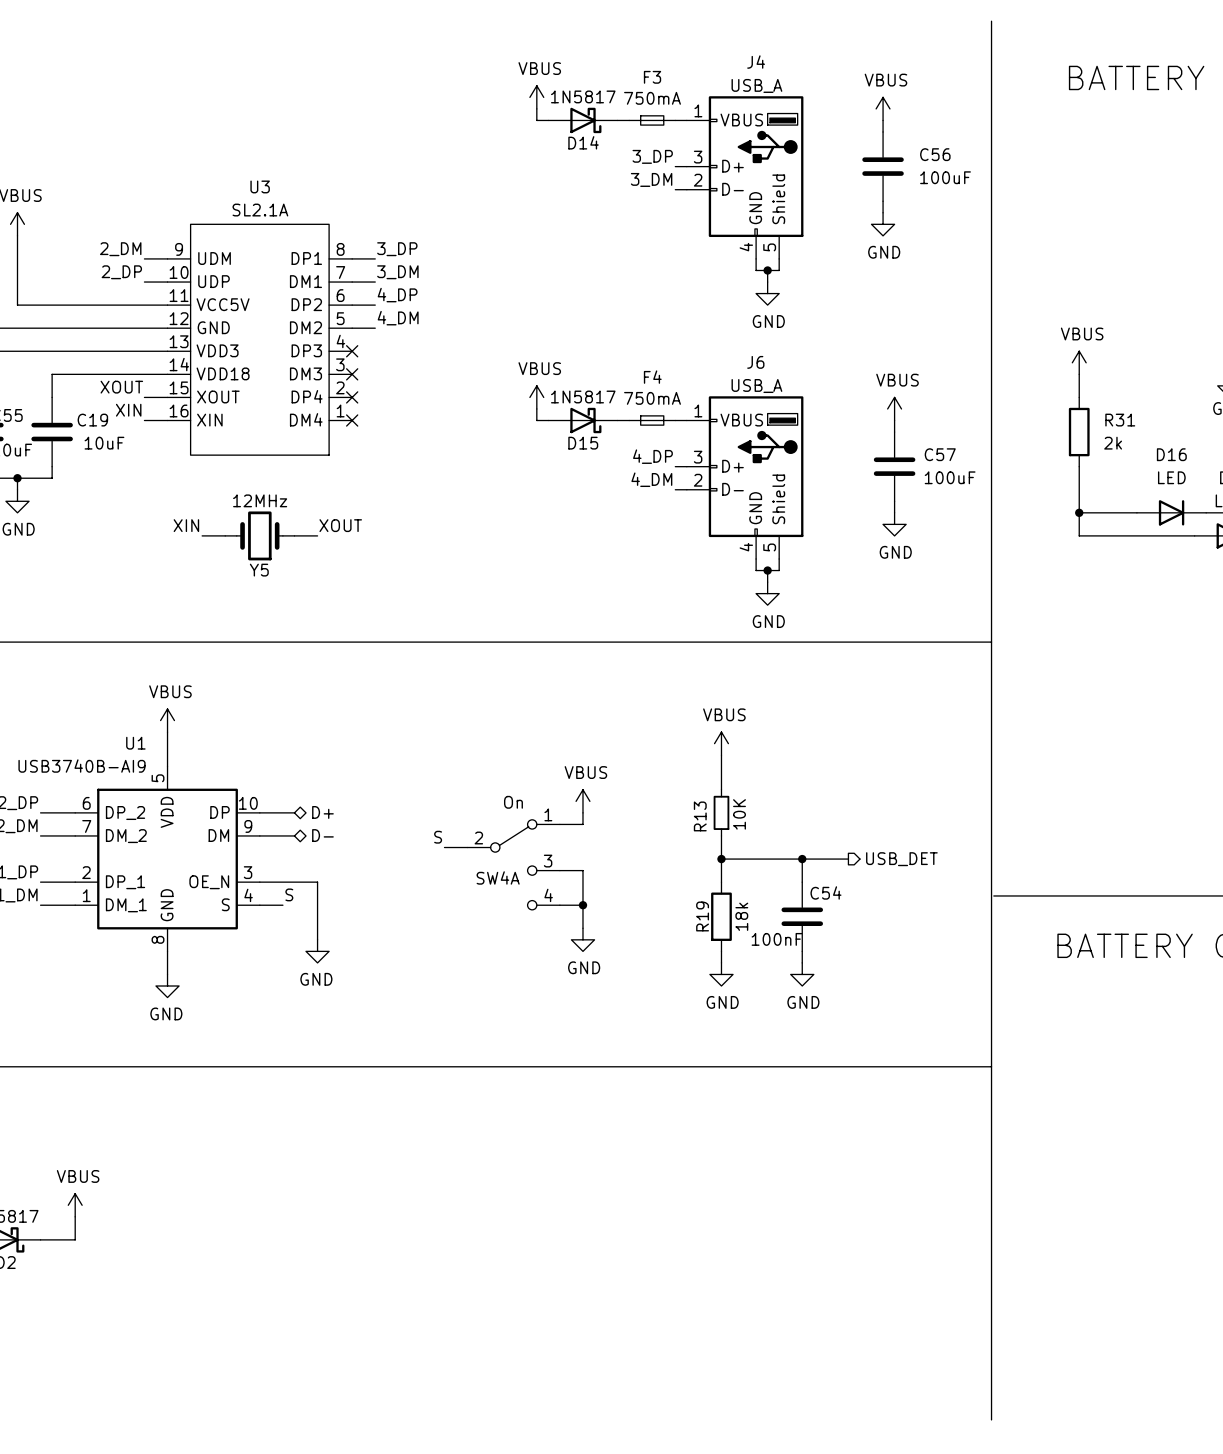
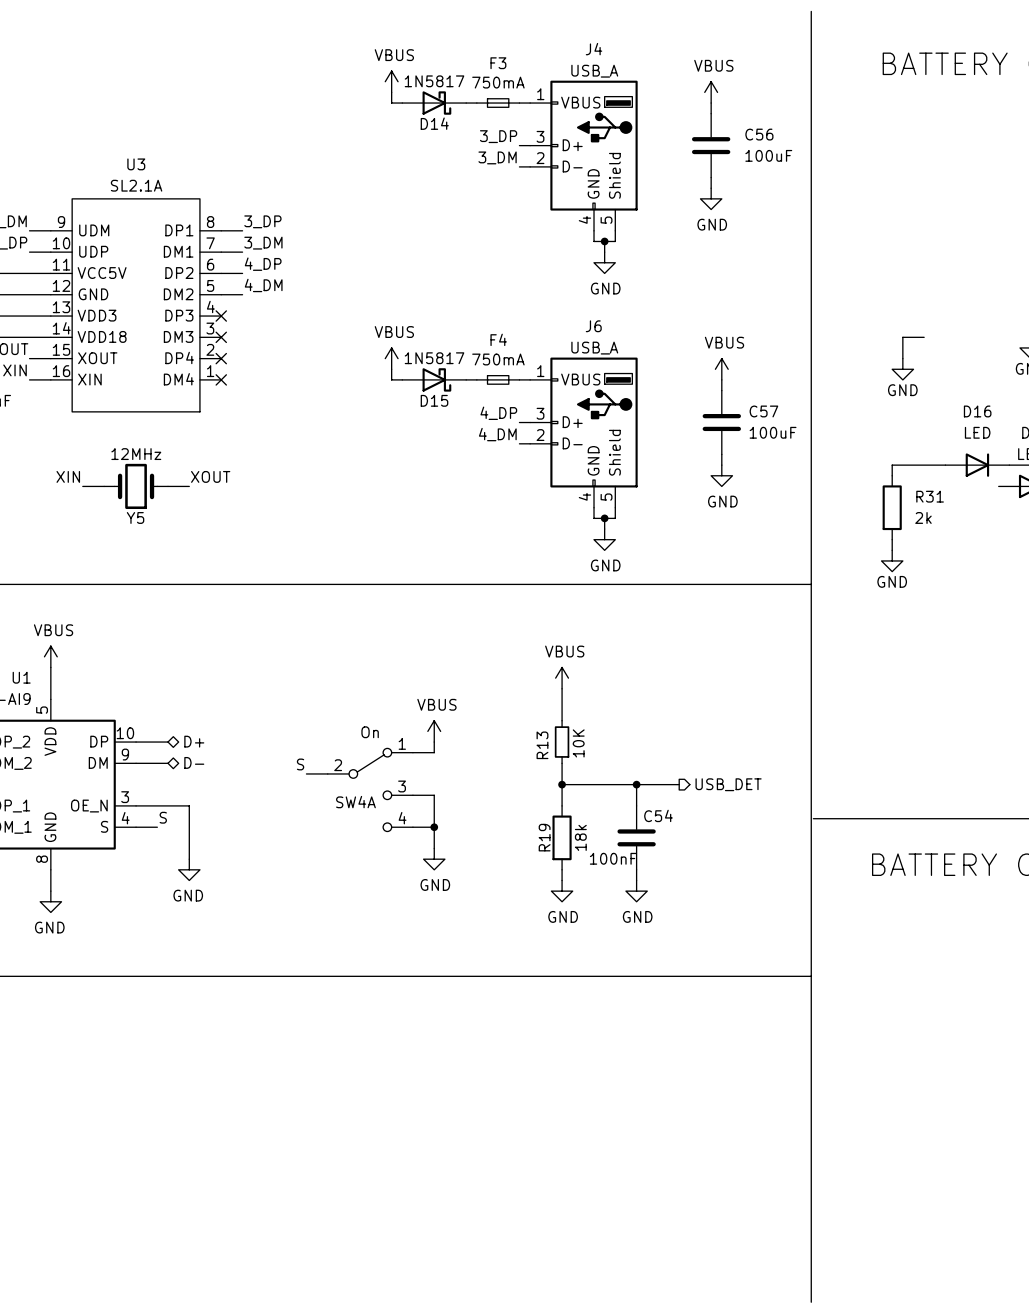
power symbol: VBUS (1079, 362) -> none
wire: (1079, 374) (1079, 397) -> none
wire: none -> (924, 337) (902, 337) (902, 358)
power symbol: none -> GND (902, 369)
R31 position: (1079, 432) -> (892, 507)
wire: (1079, 466) (1079, 512) -> none
junction: (1079, 512) -> none
wire: (1079, 524) (1079, 535) (1194, 535) -> none
wire: none -> (892, 539) (892, 550)
power symbol: none -> GND (892, 560)

